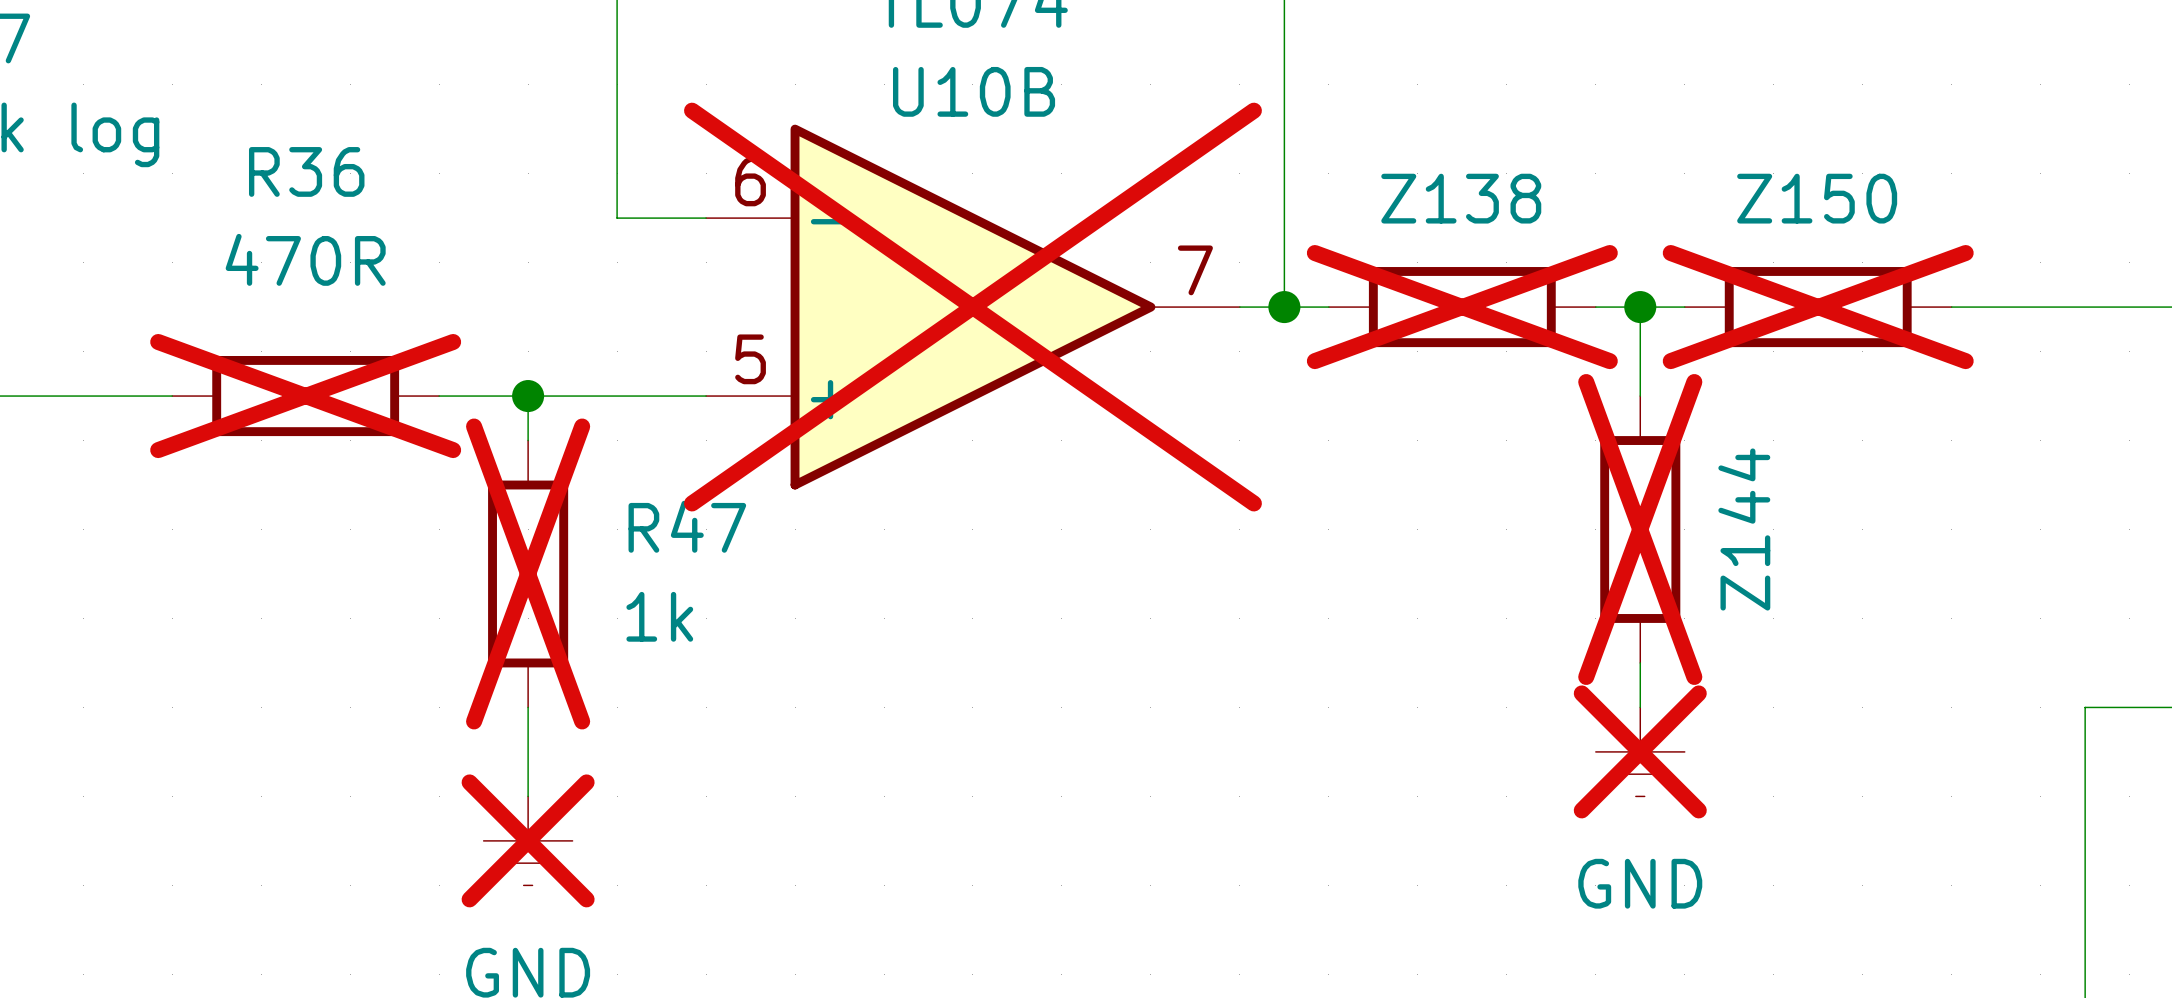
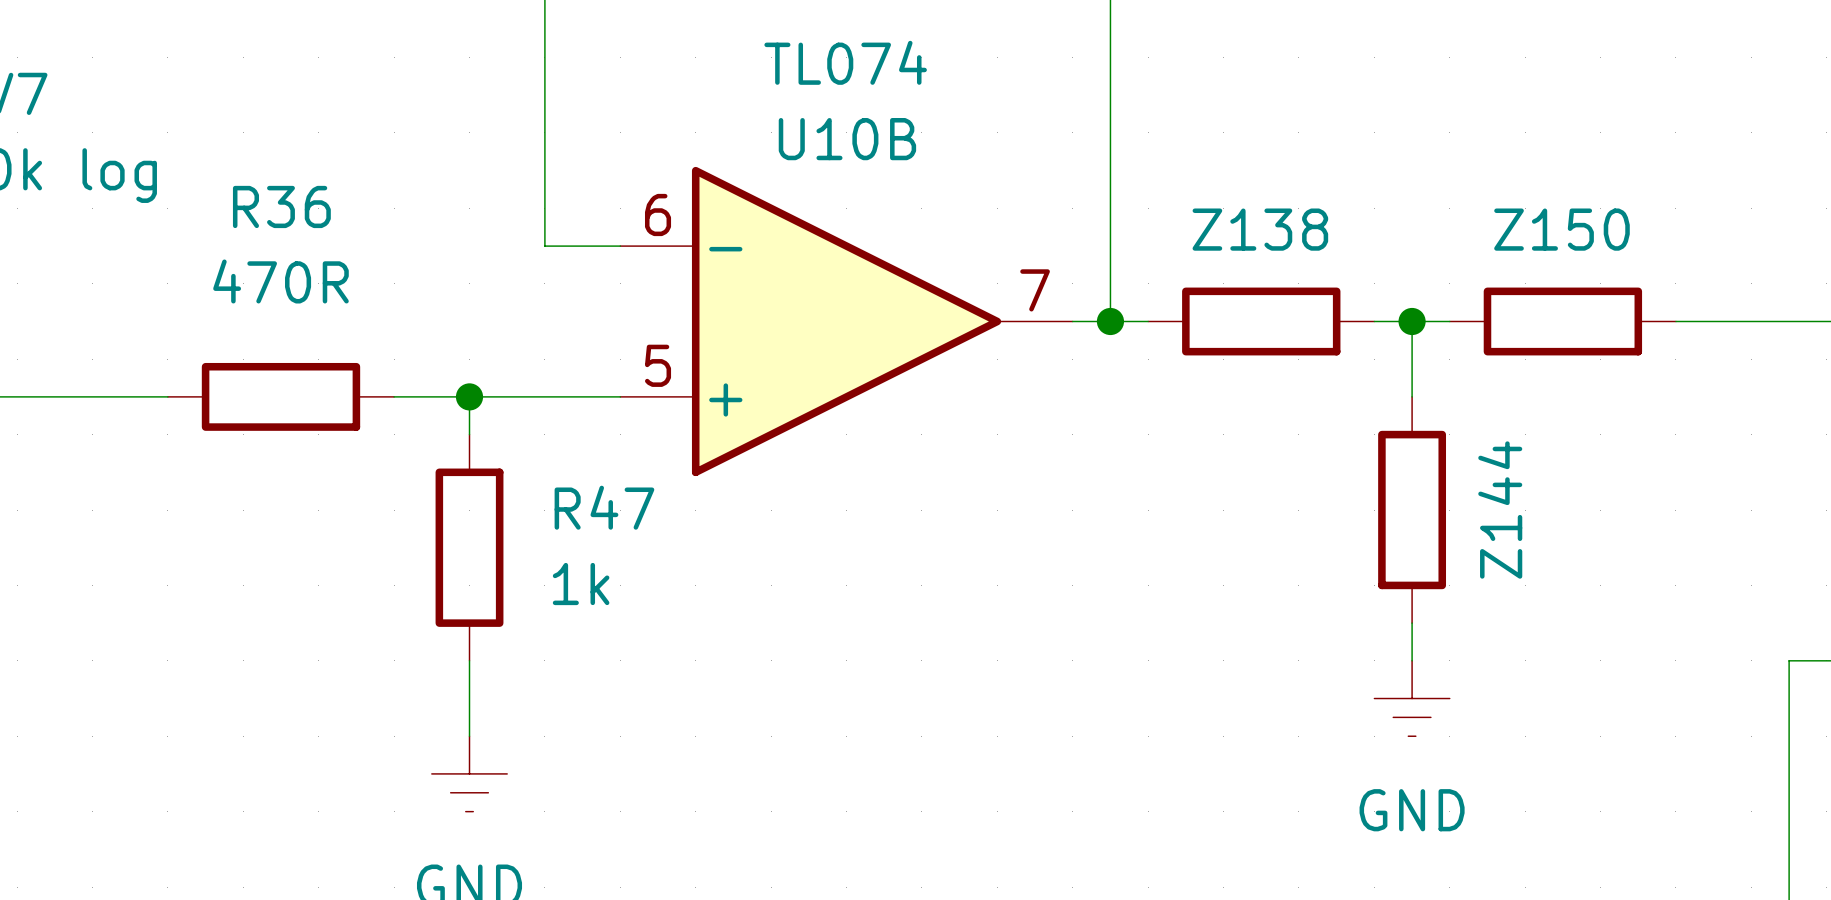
U10B do-not-place cross: (972, 307) -> none
Z138 do-not-place cross: (1462, 307) -> none
Z150 do-not-place cross: (1818, 307) -> none
R36 do-not-place cross: (305, 396) -> none
Z144 do-not-place cross: (1640, 529) -> none
R47 do-not-place cross: (528, 573) -> none
power symbol do-not-place cross: (1640, 751) -> none
power symbol do-not-place cross: (528, 840) -> none

